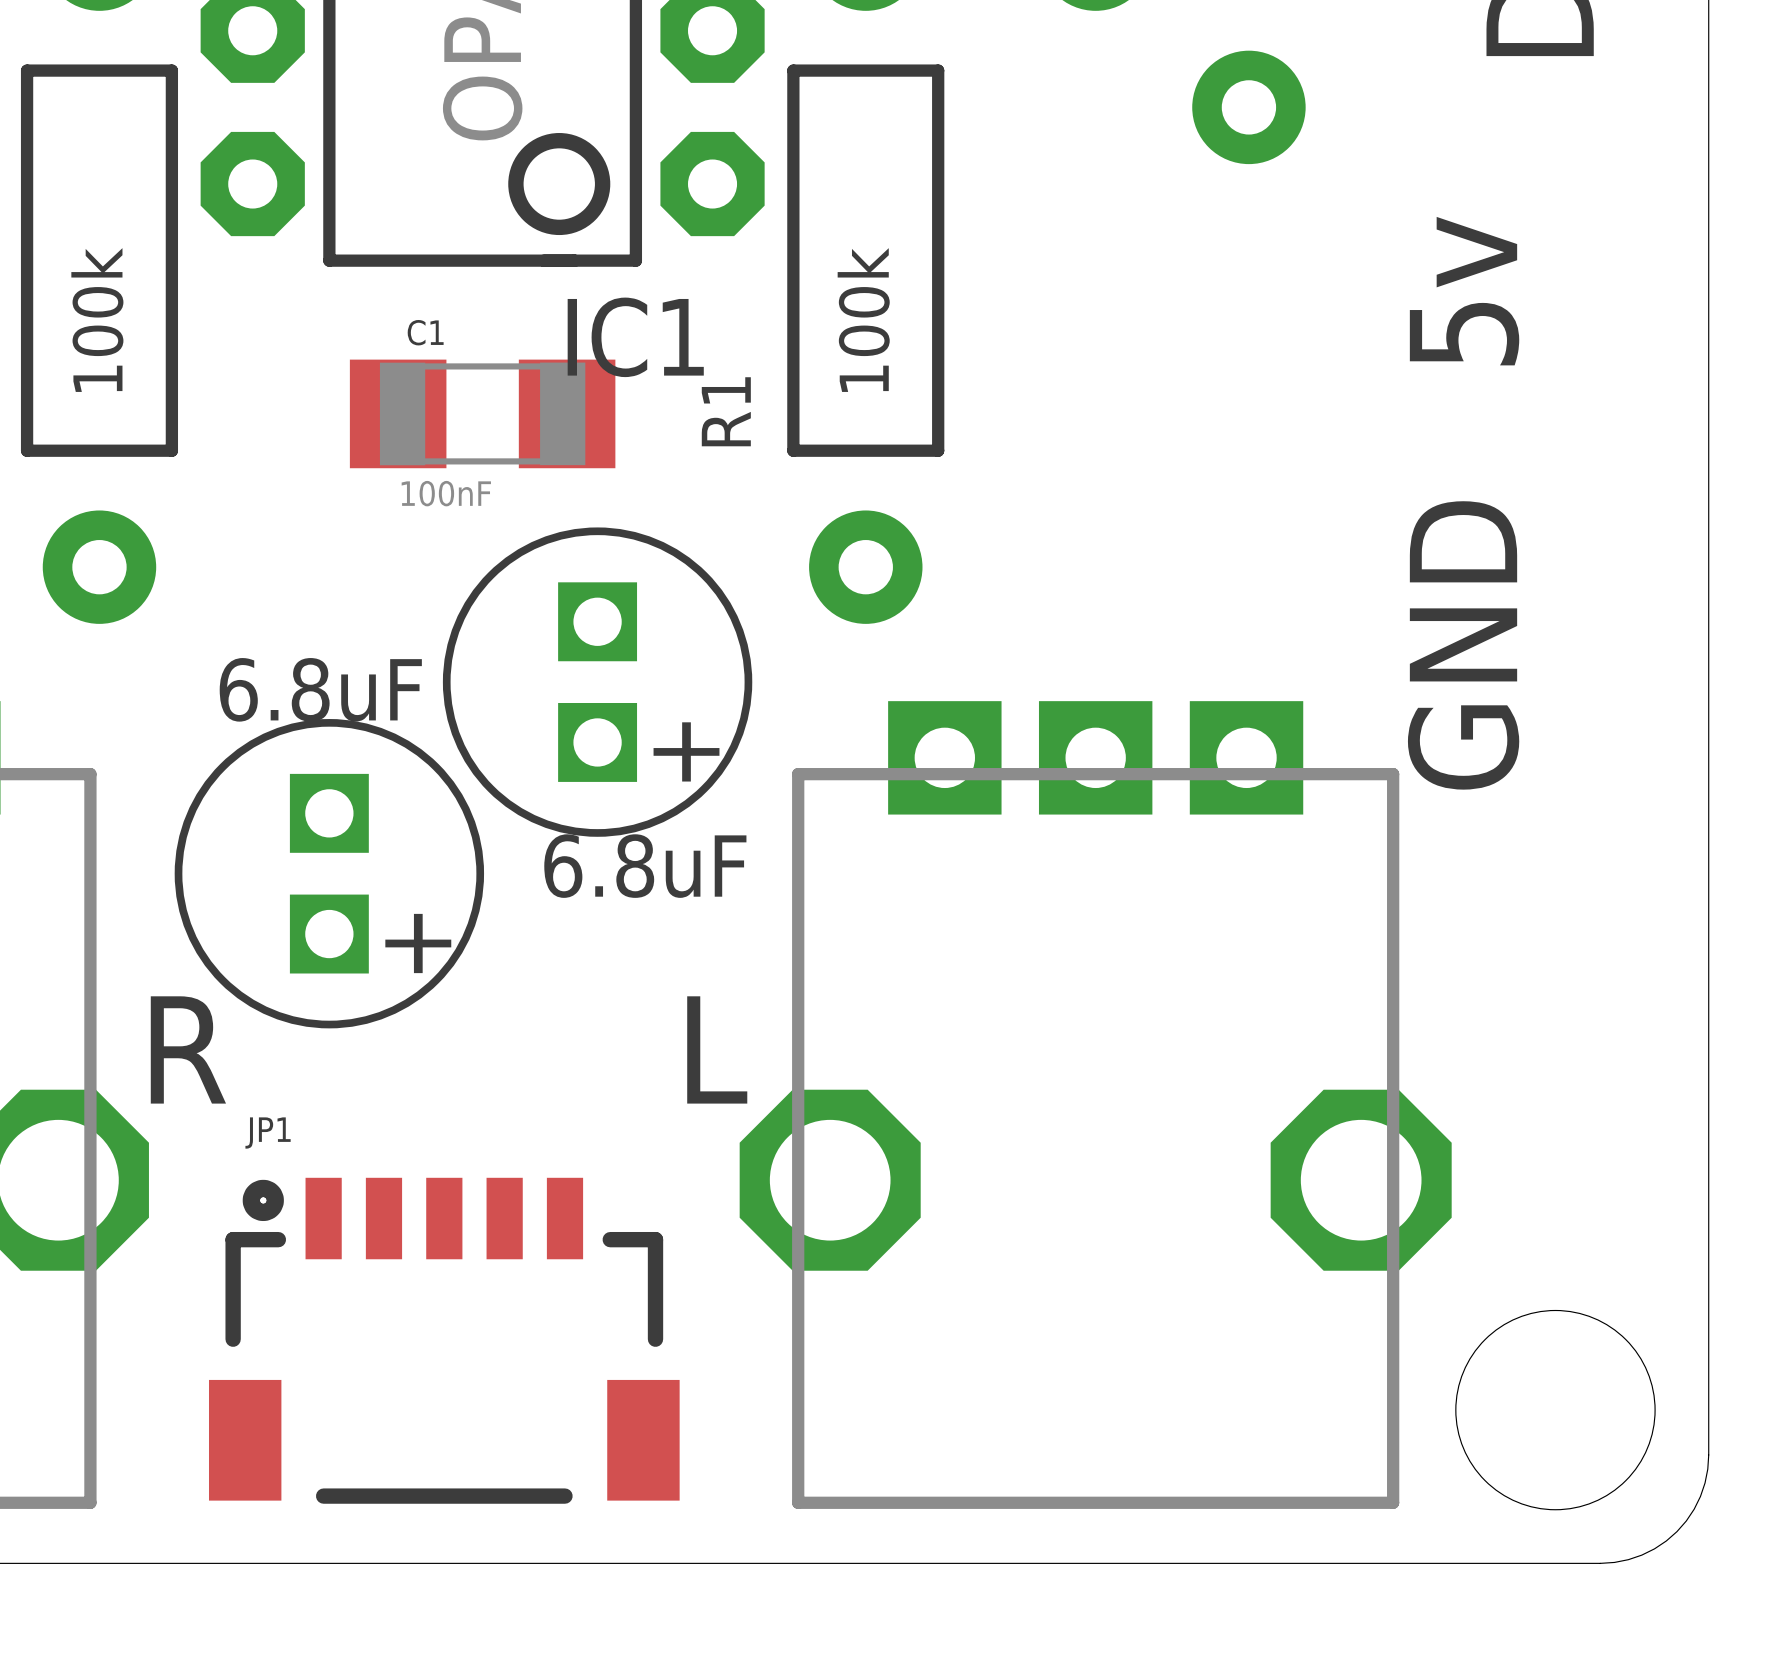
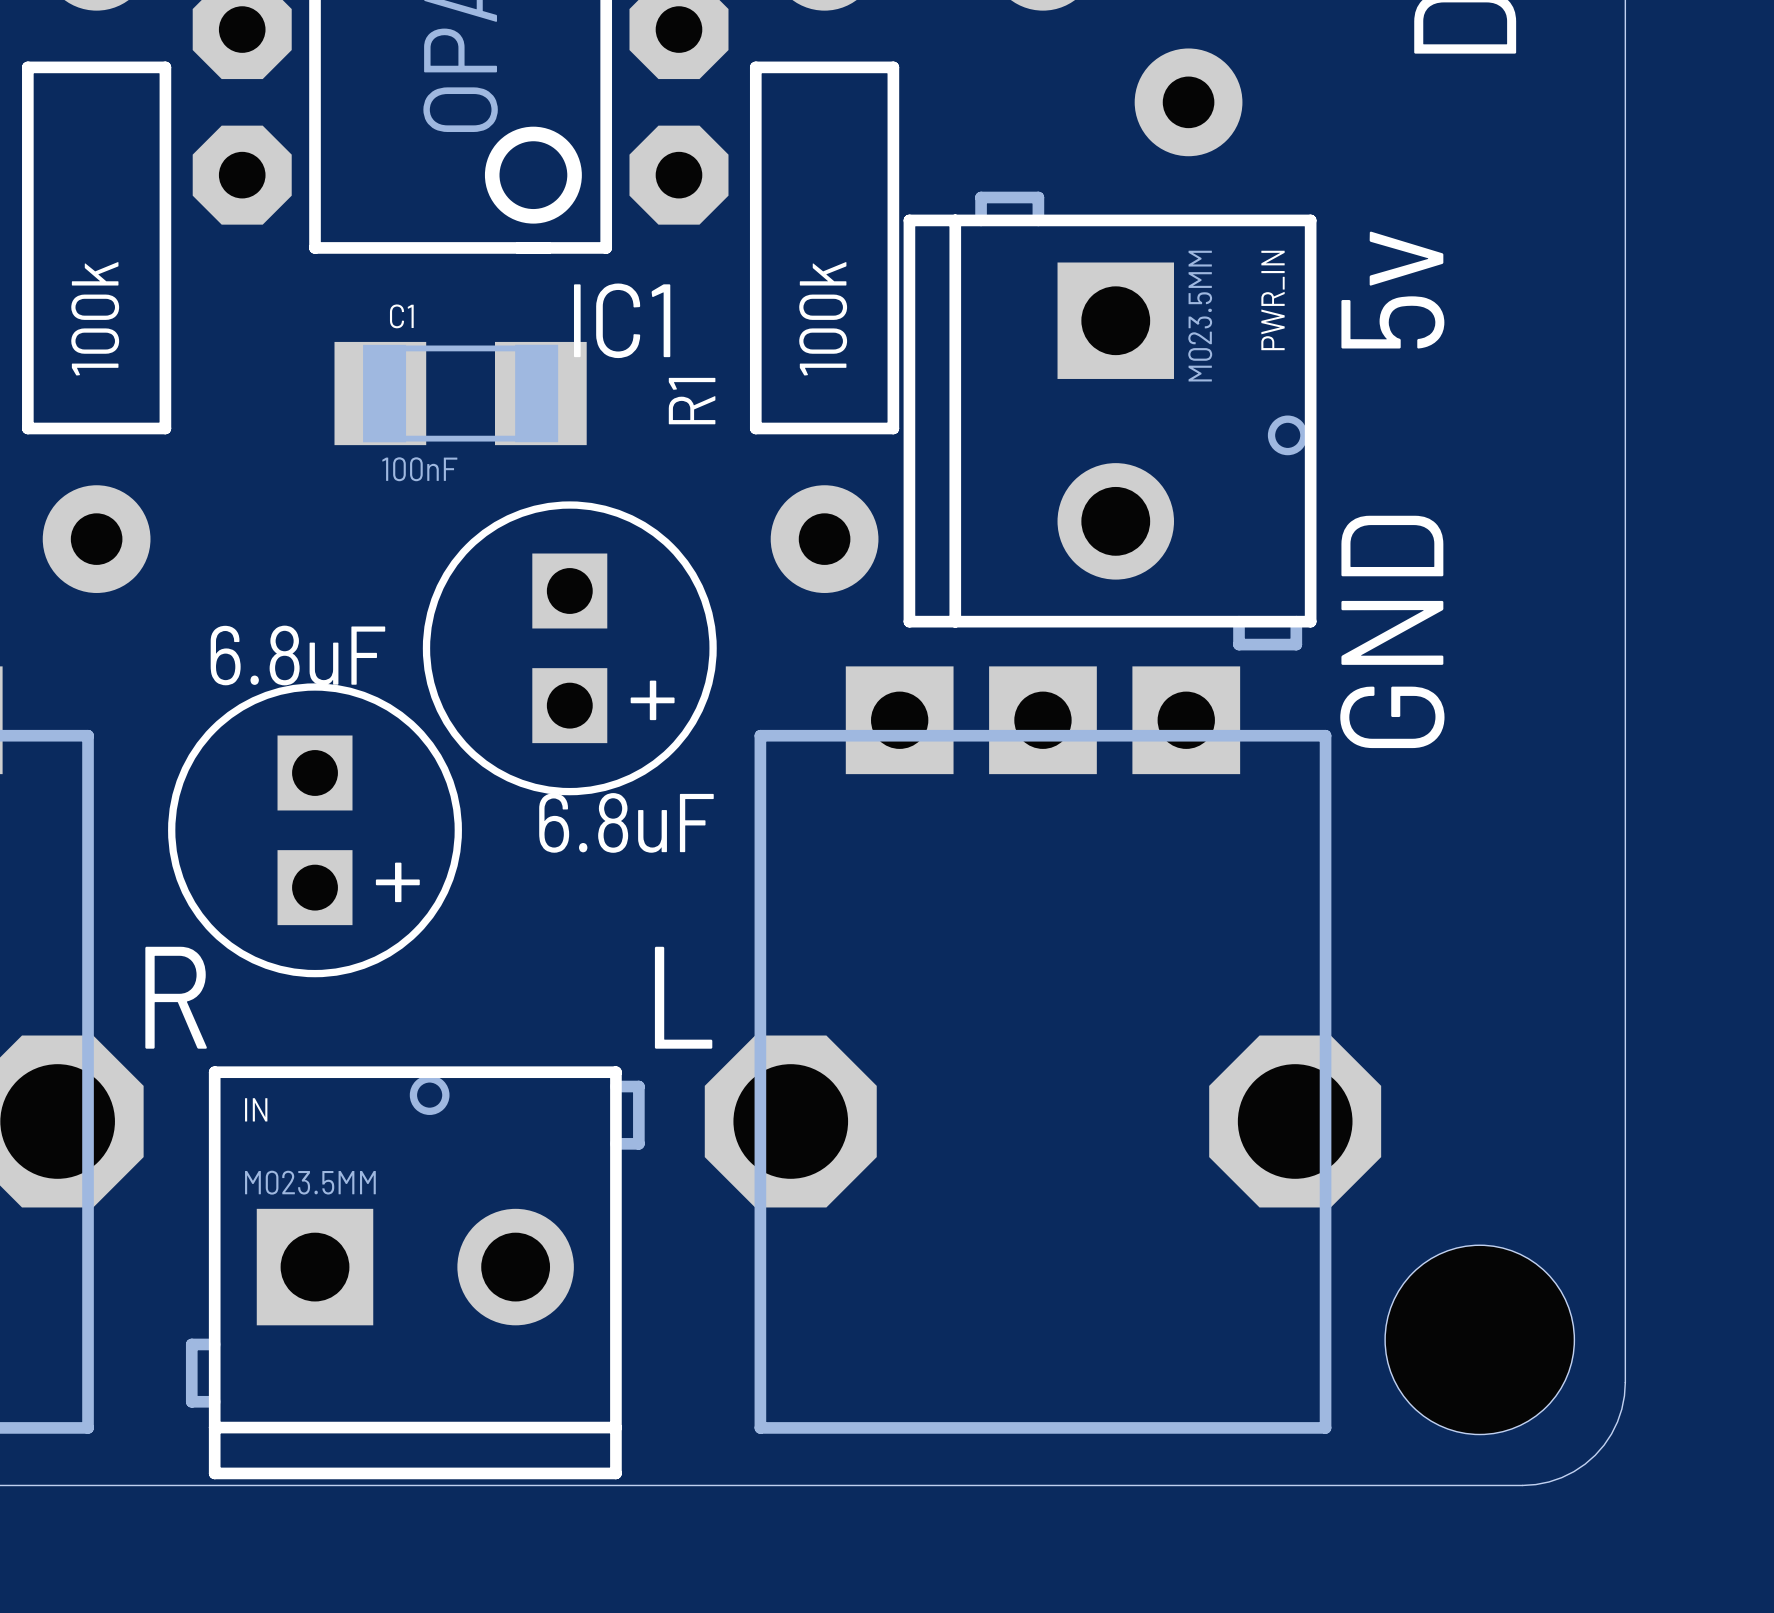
PWR_IN: none -> M023.5MM (1110, 421)
IN: none -> M023.5MM (415, 1272)
JP1: (444, 1340) -> none

